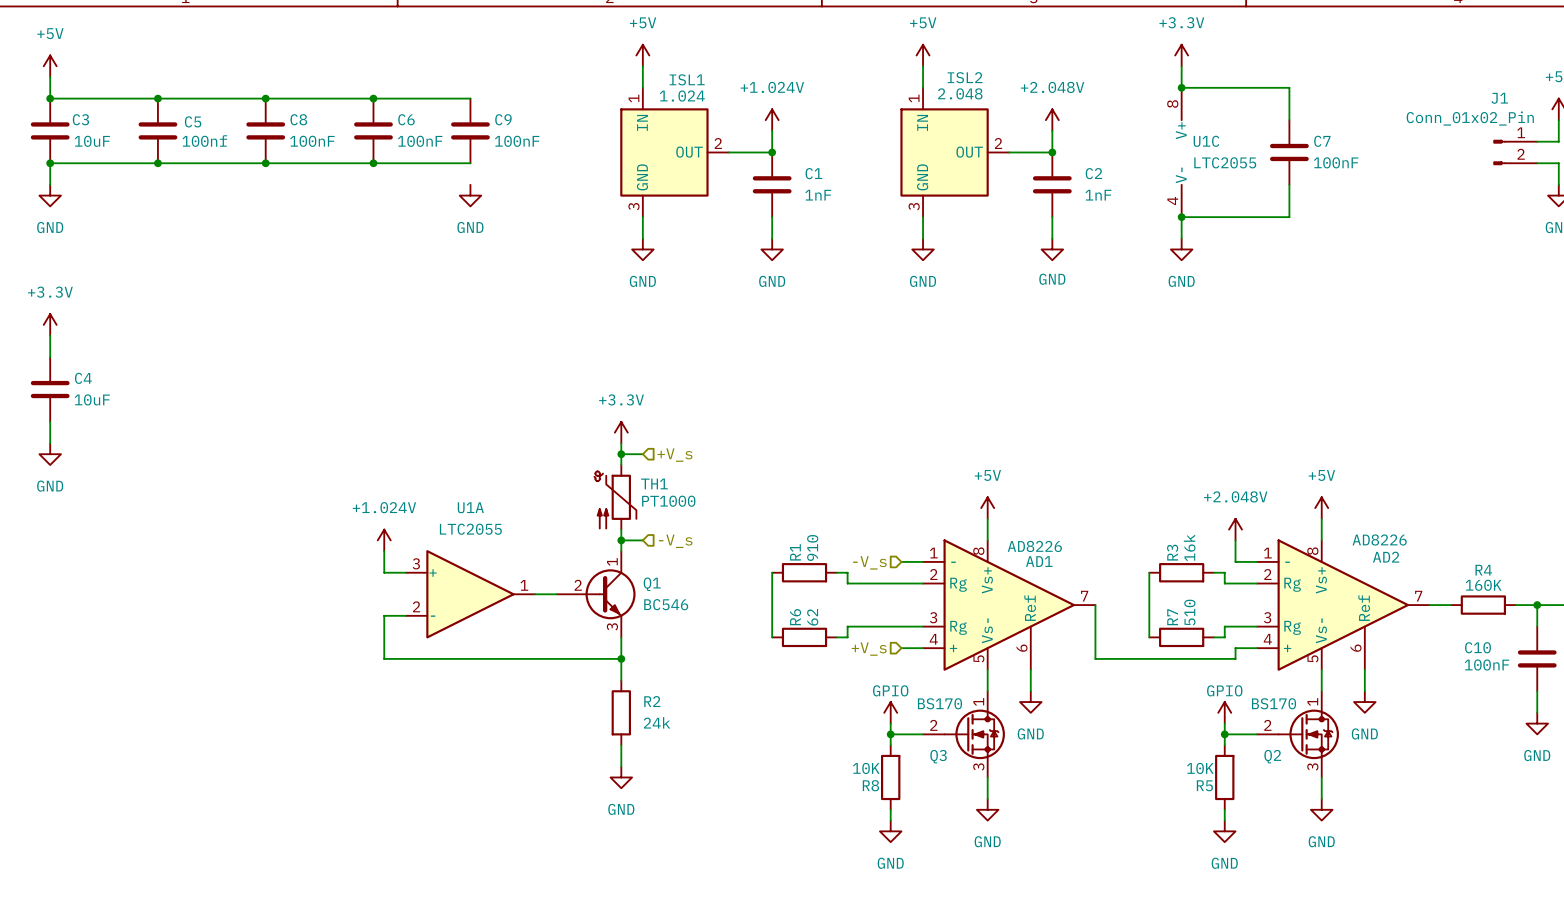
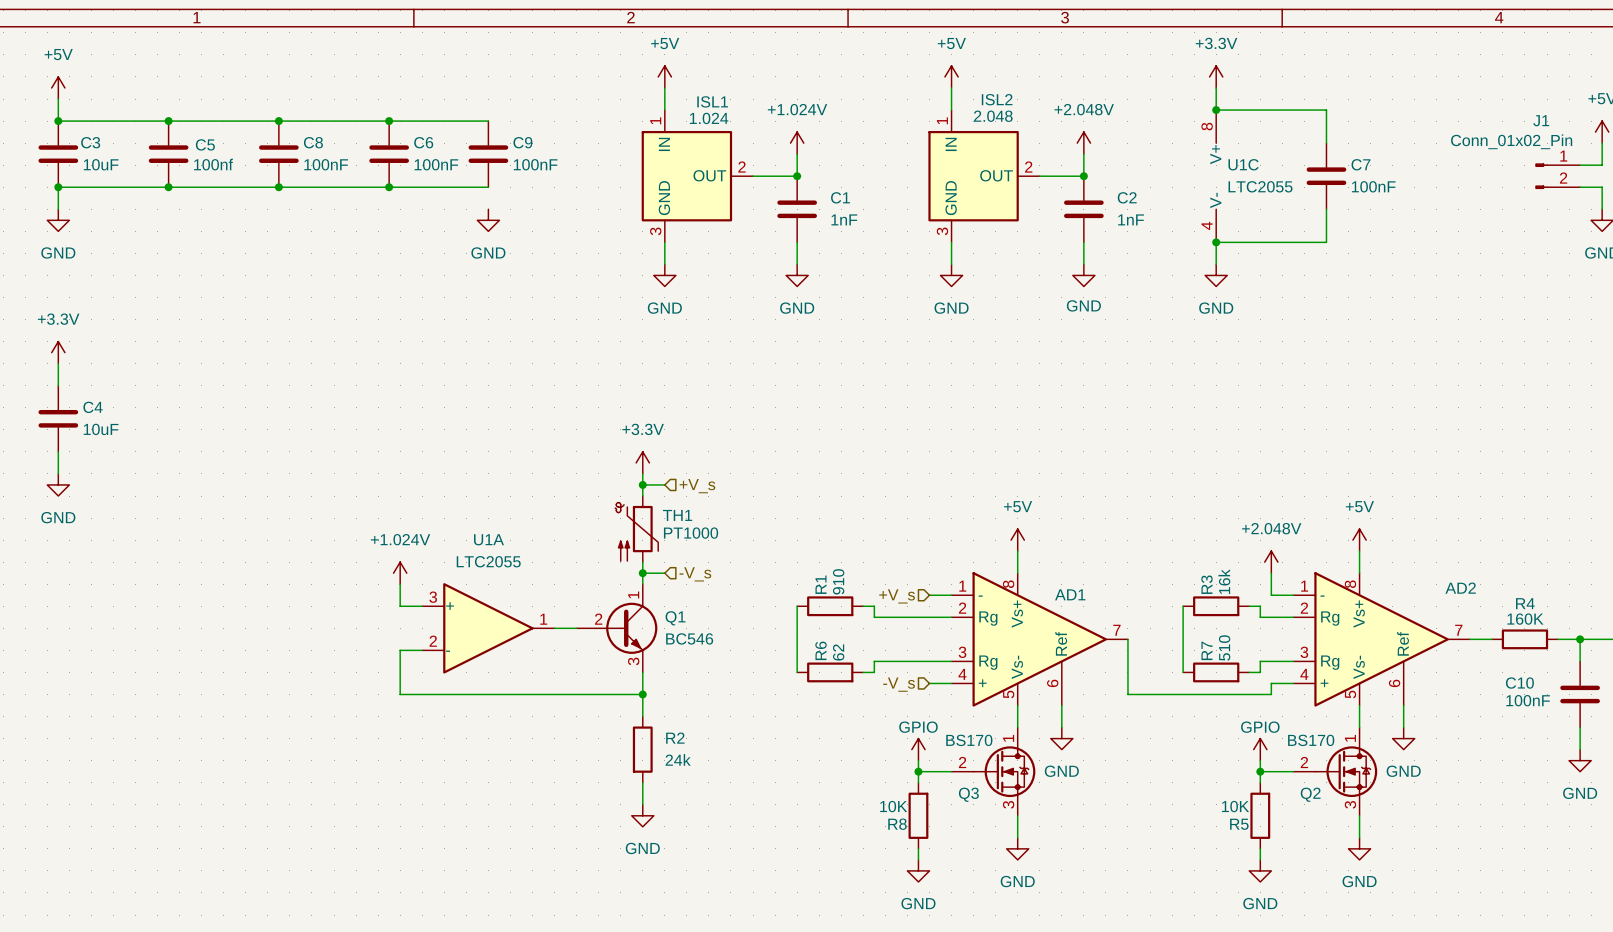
AD2 value: AD8226 (1379, 540) -> none
AD1 value: AD8226 (1034, 546) -> none
AD2 name position: AD2 (1386, 557) -> AD2 (1460, 588)
hierarchical label: -V_s (869, 562) -> +V_s (897, 596)
hierarchical label: +V_s (869, 649) -> -V_s (899, 684)

